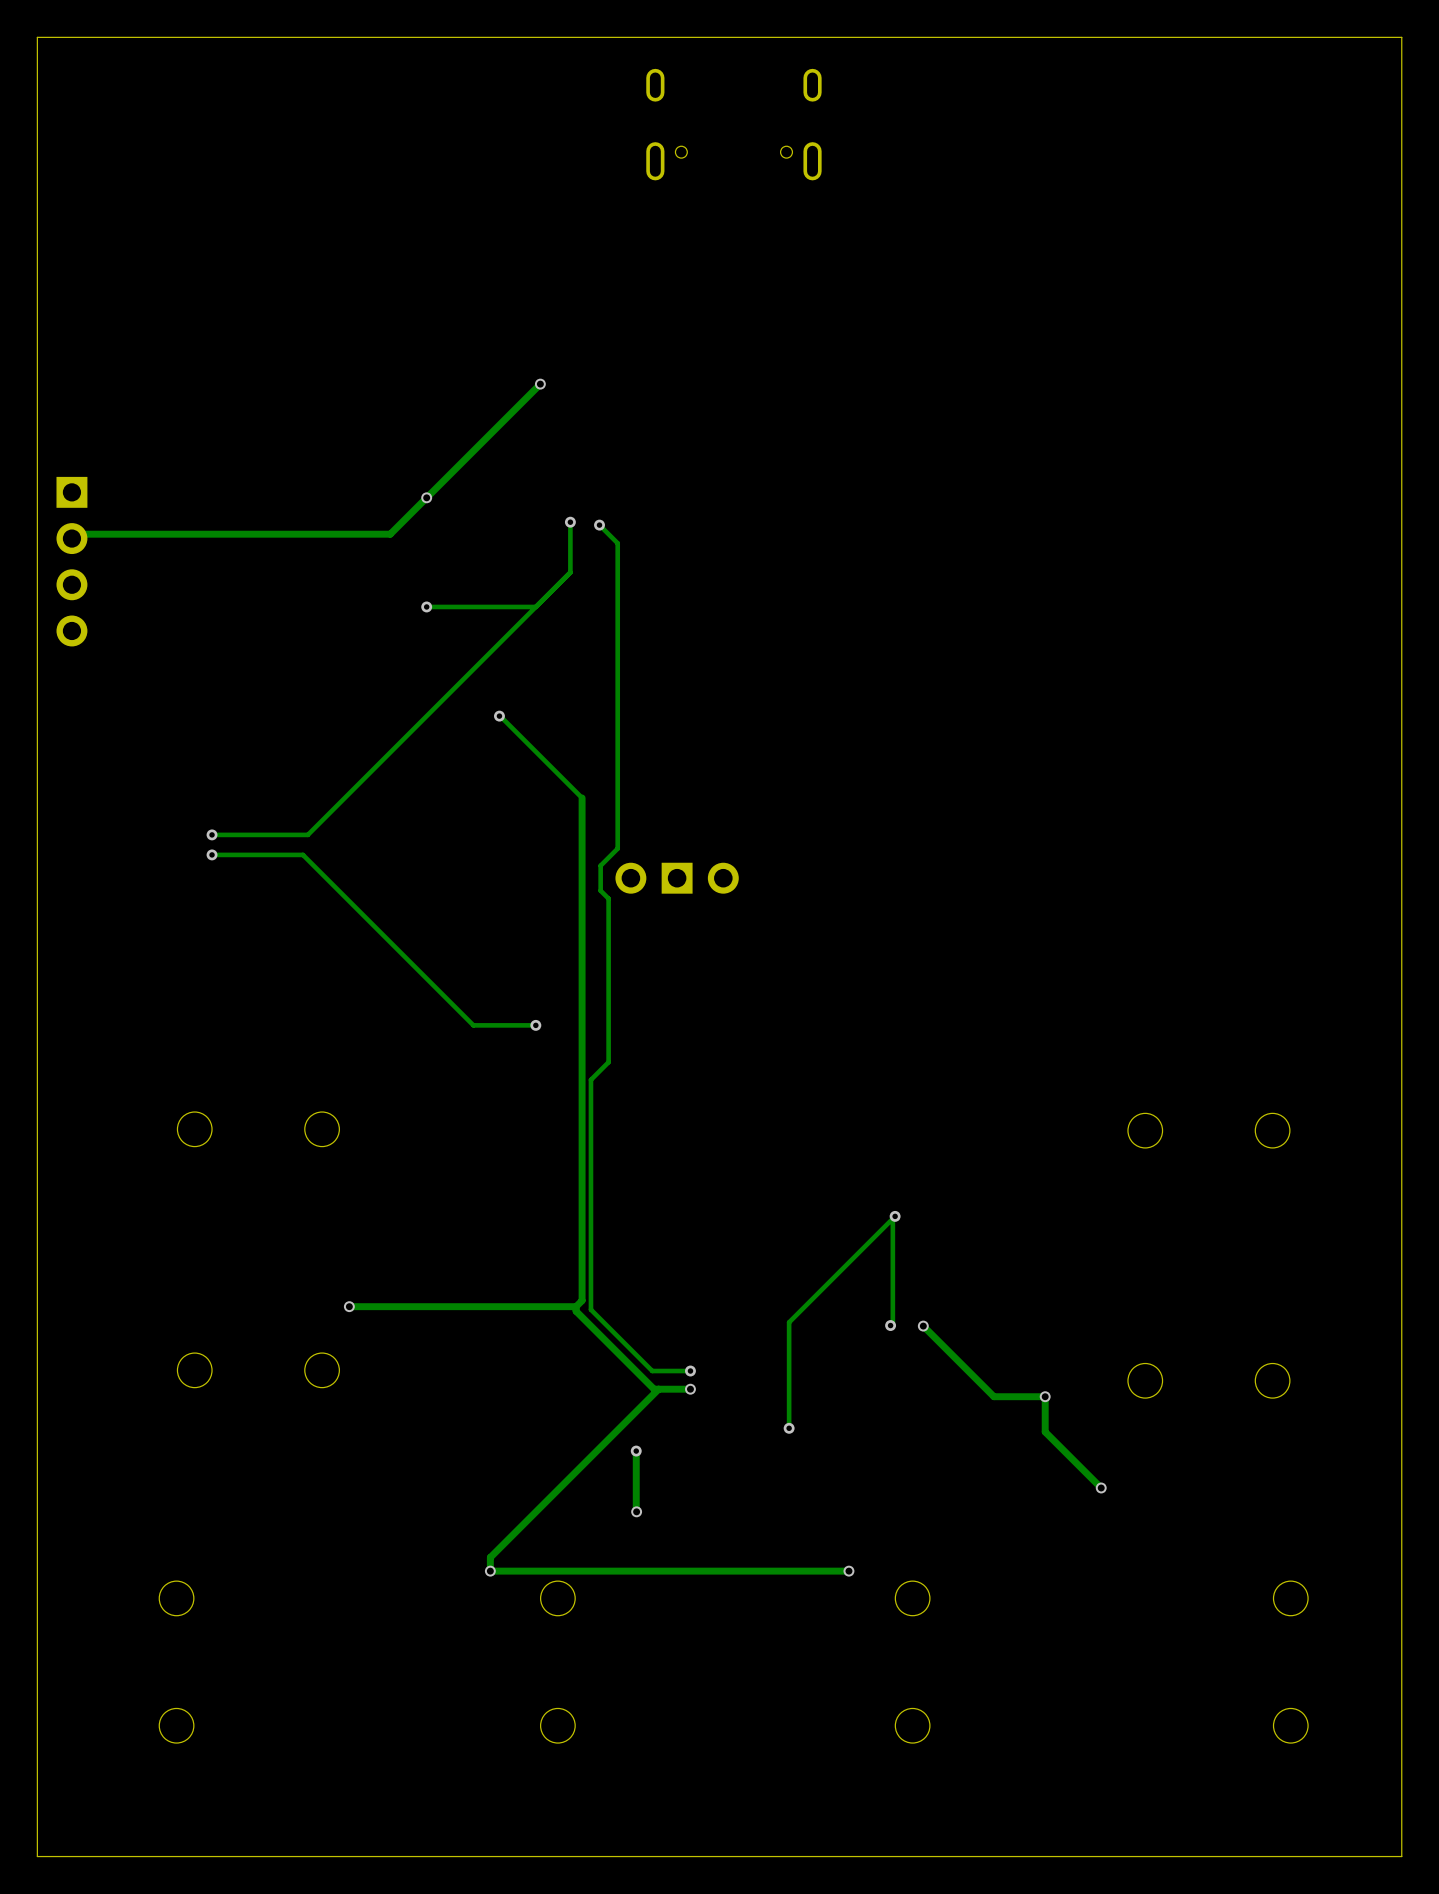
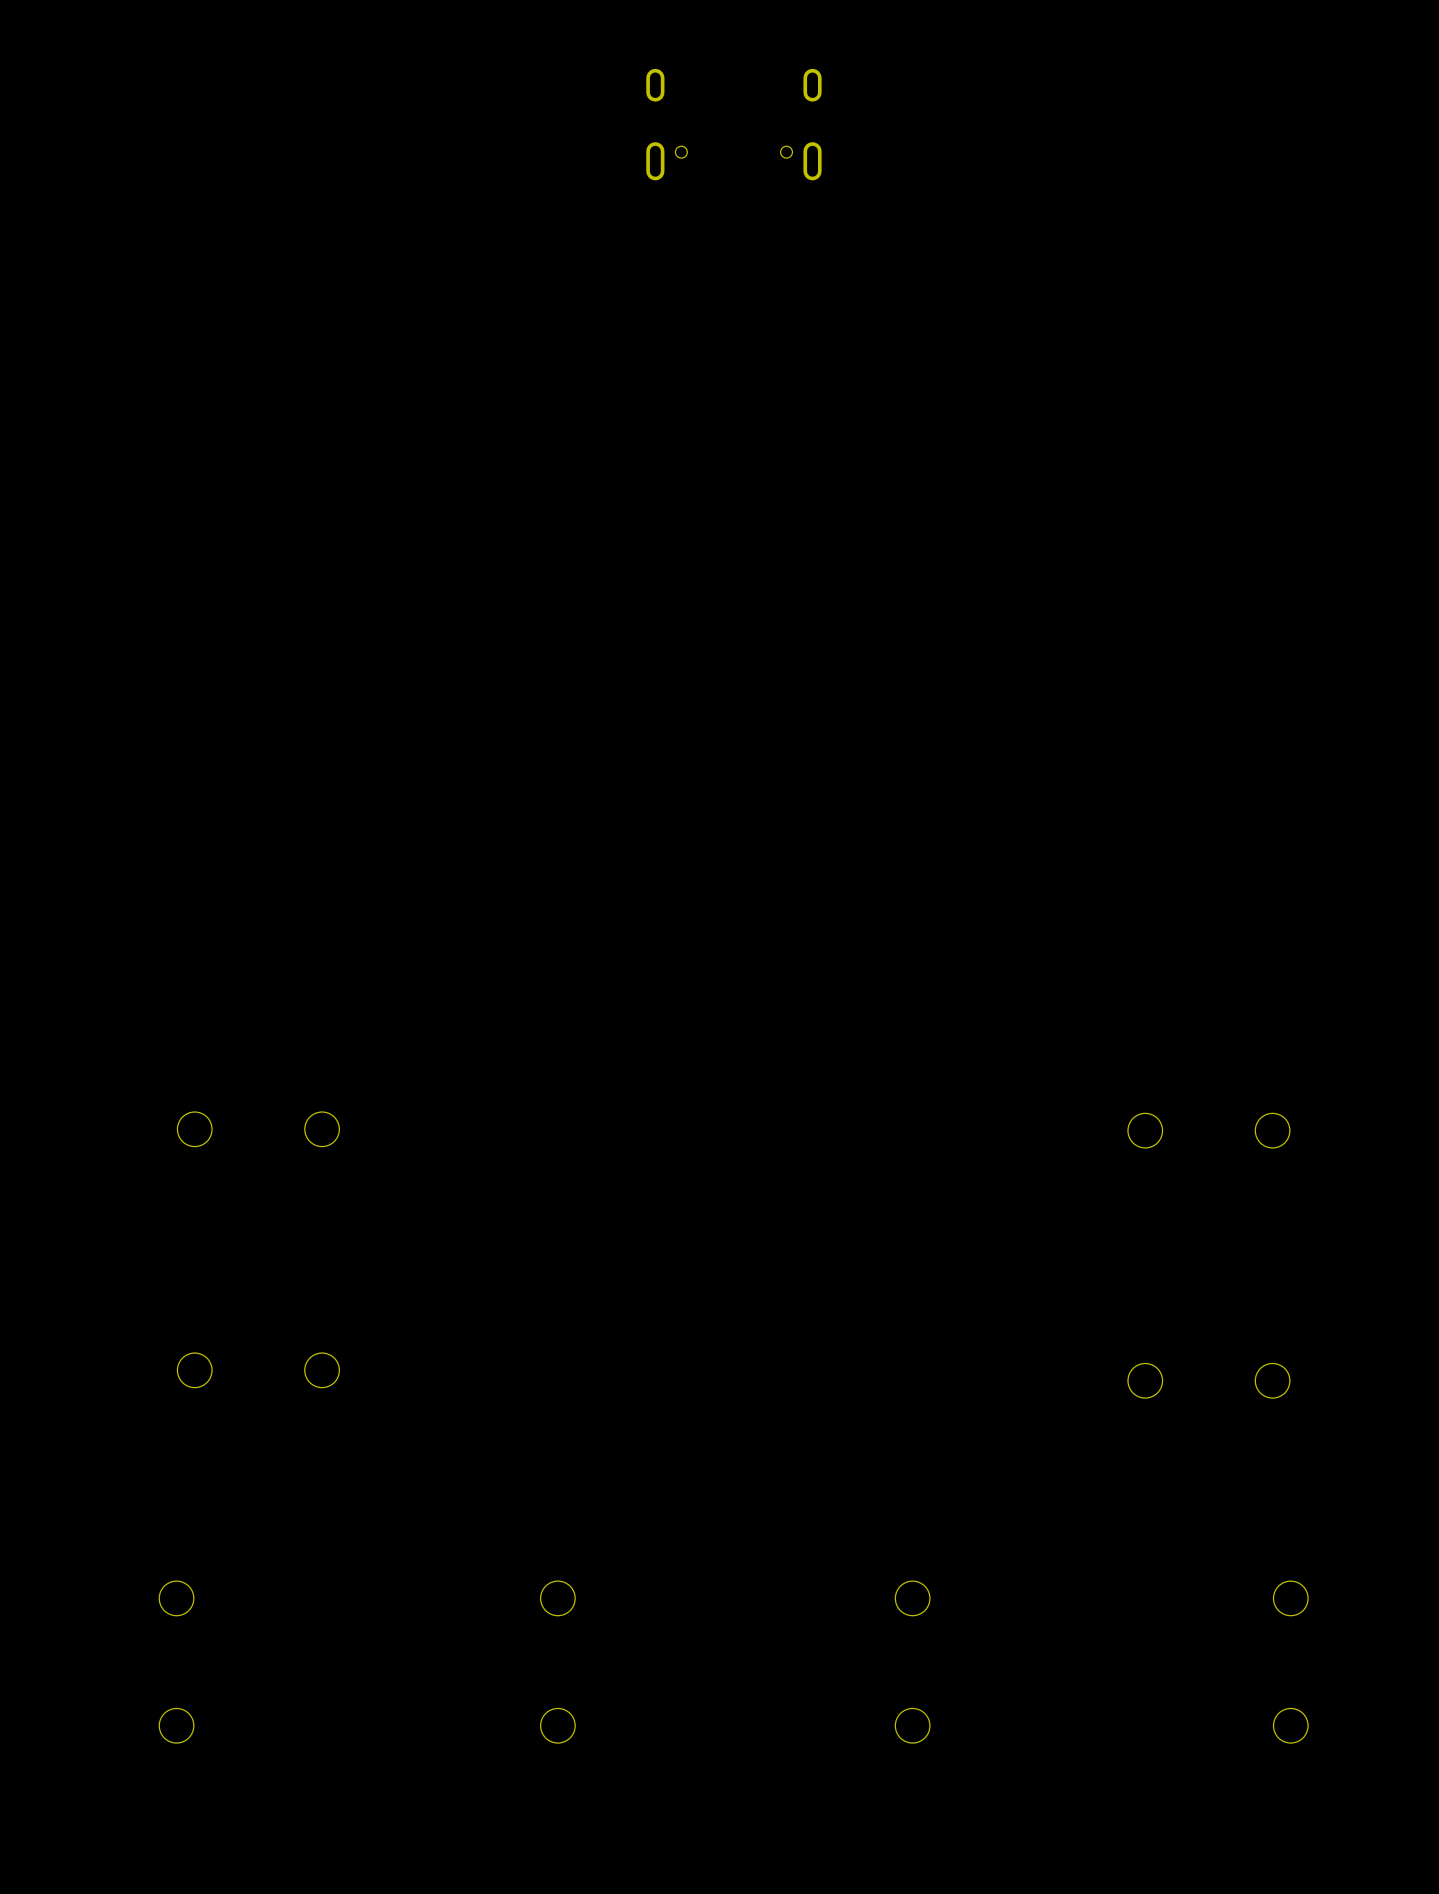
board edge: (1401, 37) (37, 37) (37, 1856) (1401, 1856) (1401, 37) -> none
track: (540, 384) (390, 534) (76, 534) (71, 538) -> none
via: (540, 384) -> none
via: (426, 497) -> none
track: (570, 522) (570, 572) (307, 834) (212, 834) -> none
via: (570, 522) -> none
track: (599, 525) (617, 543) (617, 848) (600, 865) (600, 890) (608, 898) (608, 1062) (590, 1079) (590, 1309) (652, 1371) (690, 1371) -> none
via: (599, 525) -> none
part: (71, 561) -> none
via: (426, 606) -> none
track: (535, 606) (426, 606) -> none
track: (499, 716) (582, 797) (582, 1300) (576, 1306) -> none
via: (499, 716) -> none
via: (212, 834) -> none
track: (212, 854) (302, 854) (473, 1025) (535, 1025) -> none
via: (212, 854) -> none
part: (677, 878) -> none
via: (535, 1025) -> none
track: (895, 1216) (789, 1322) (789, 1428) -> none
via: (895, 1216) -> none
track: (892, 1218) (892, 1323) (890, 1325) -> none
via: (349, 1306) -> none
track: (576, 1306) (349, 1306) -> none
track: (576, 1306) (576, 1311) (654, 1389) (690, 1389) -> none
via: (890, 1325) -> none
track: (923, 1326) (993, 1396) (1045, 1396) (1045, 1431) (1101, 1487) -> none
via: (923, 1326) -> none
via: (690, 1371) -> none
track: (658, 1389) (490, 1557) (490, 1571) (848, 1571) -> none
via: (690, 1389) -> none
via: (1045, 1396) -> none
via: (789, 1428) -> none
track: (636, 1451) (636, 1511) -> none
via: (636, 1451) -> none
via: (1101, 1487) -> none
via: (636, 1511) -> none
via: (490, 1571) -> none
via: (848, 1571) -> none

